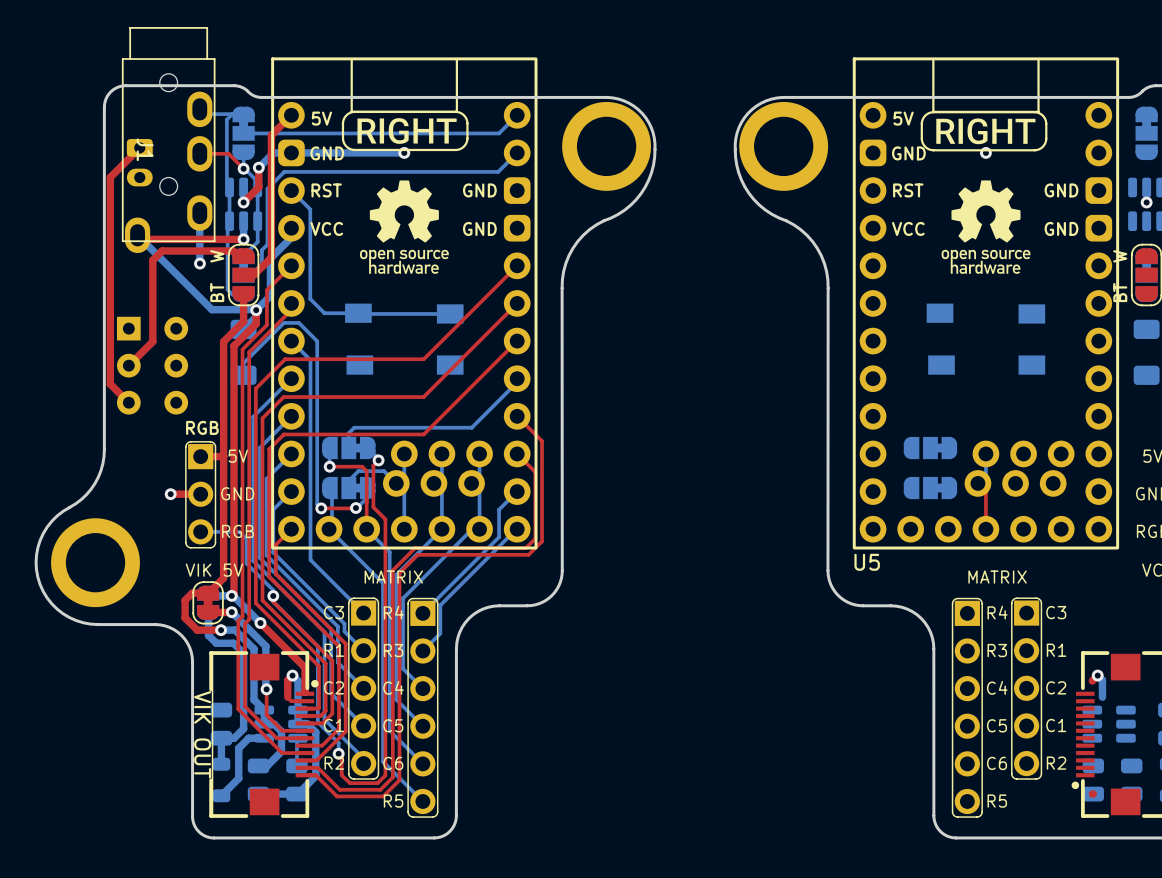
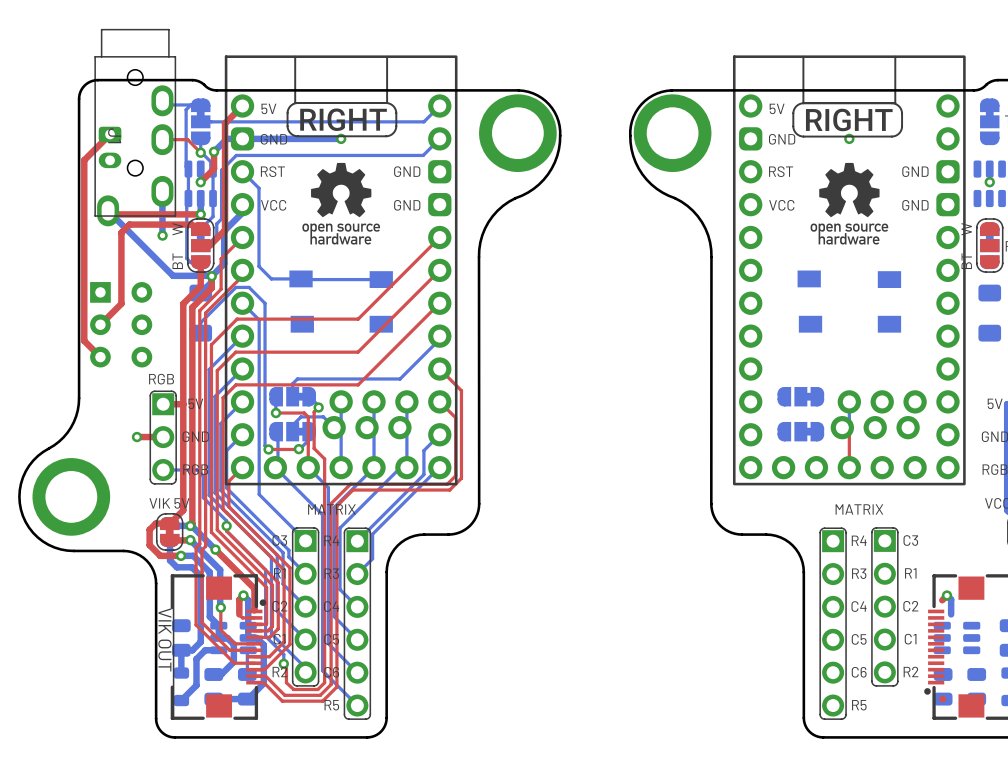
U5 name: U5 (867, 562) -> none

